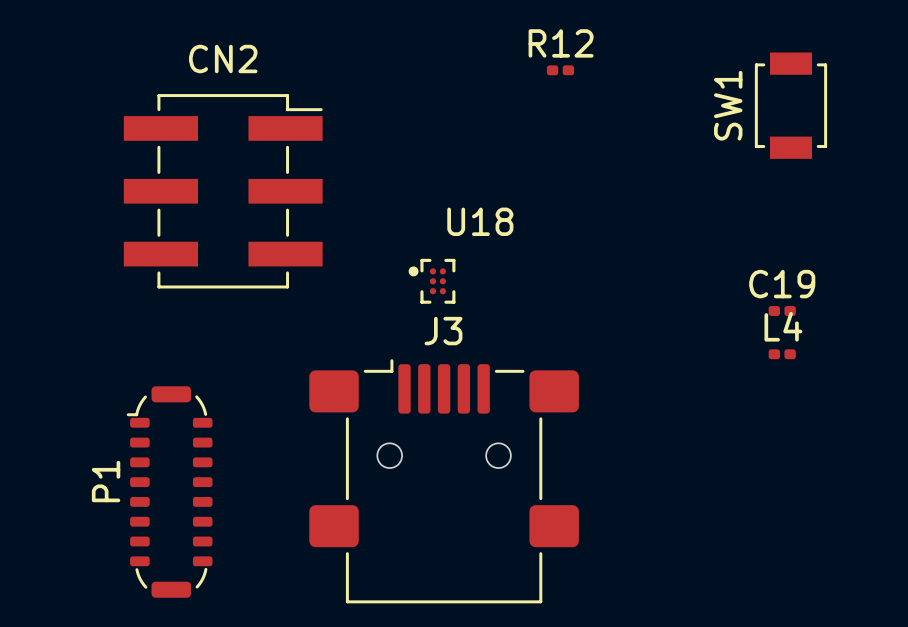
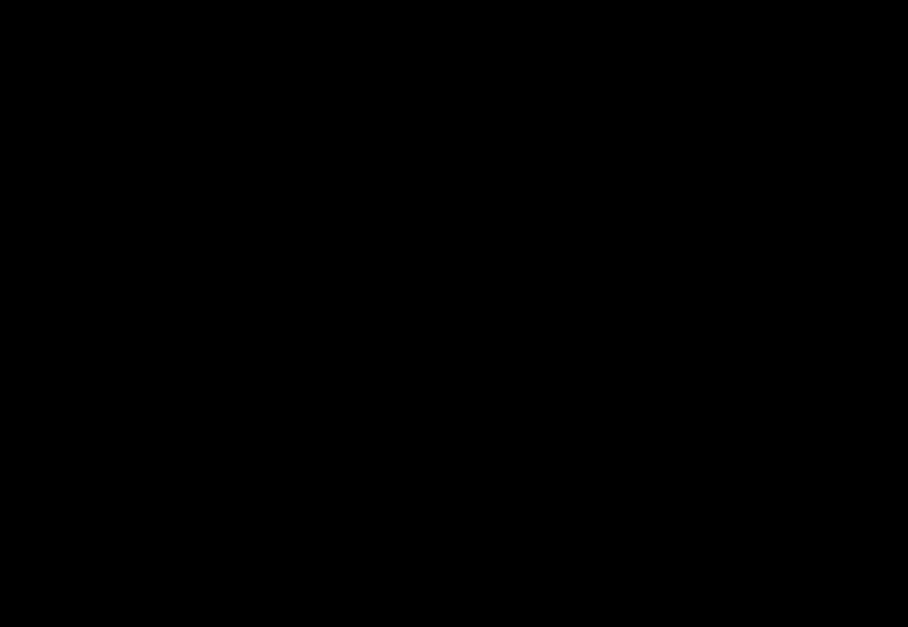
R12: (560, 70) -> none
SW1: (790, 105) -> none
CN2: (223, 191) -> none
U18: (432, 281) -> none
C19: (782, 310) -> none
L4: (782, 354) -> none
J3: (444, 481) -> none
P1: (169, 492) -> none

